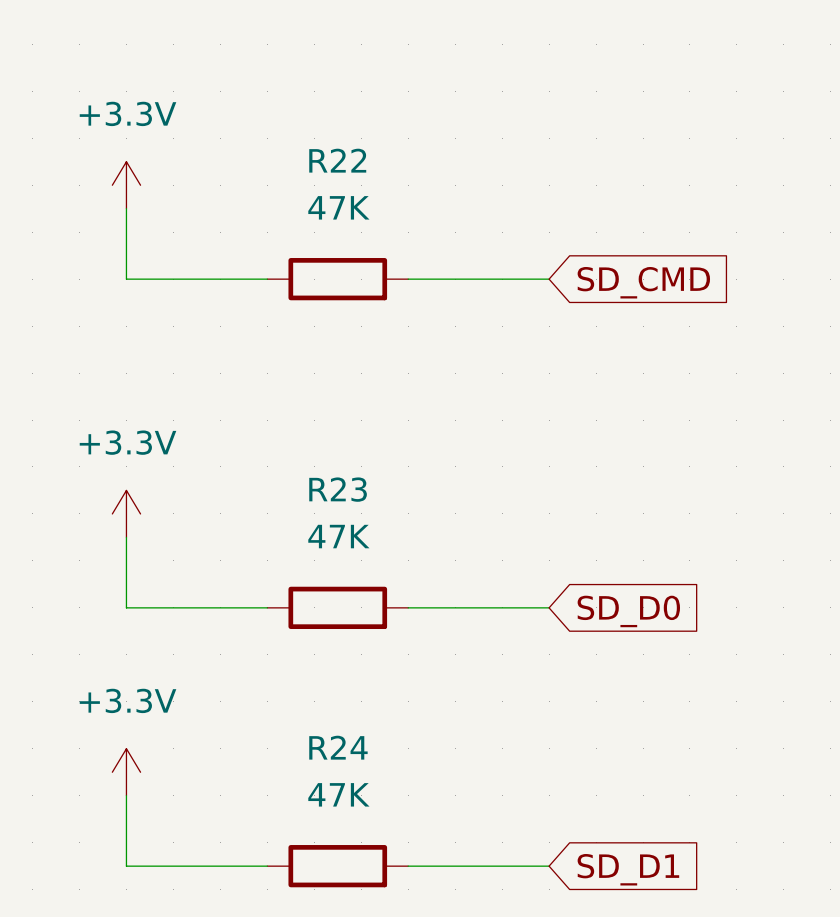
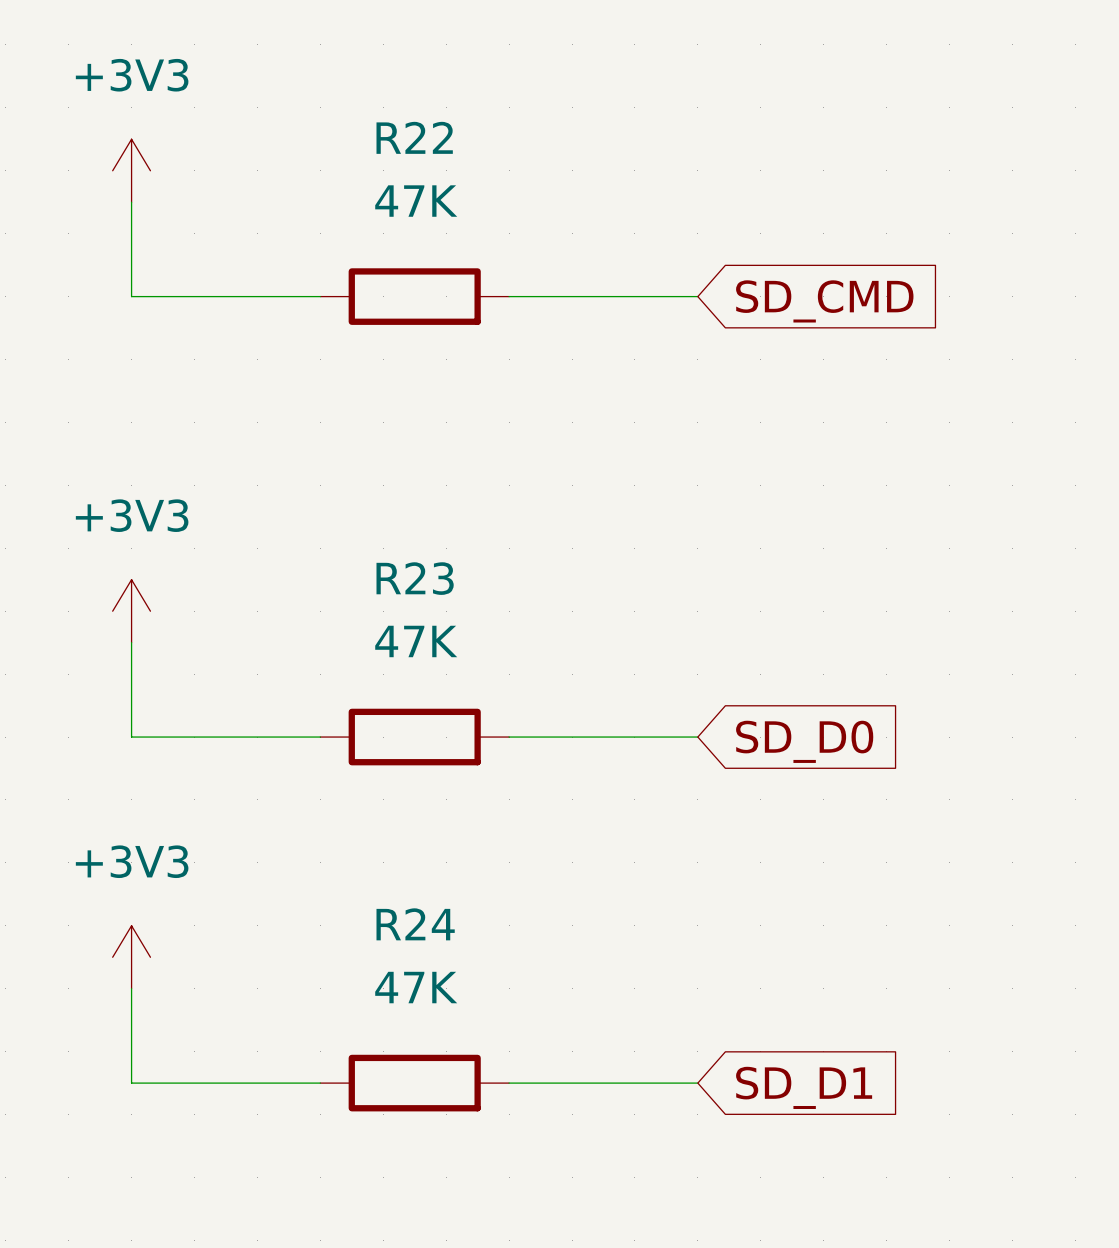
power symbol: +3.3V (126, 185) -> +3V3 (131, 170)
power symbol: +3.3V (126, 513) -> +3V3 (131, 611)
power symbol: +3.3V (126, 772) -> +3V3 (131, 957)

